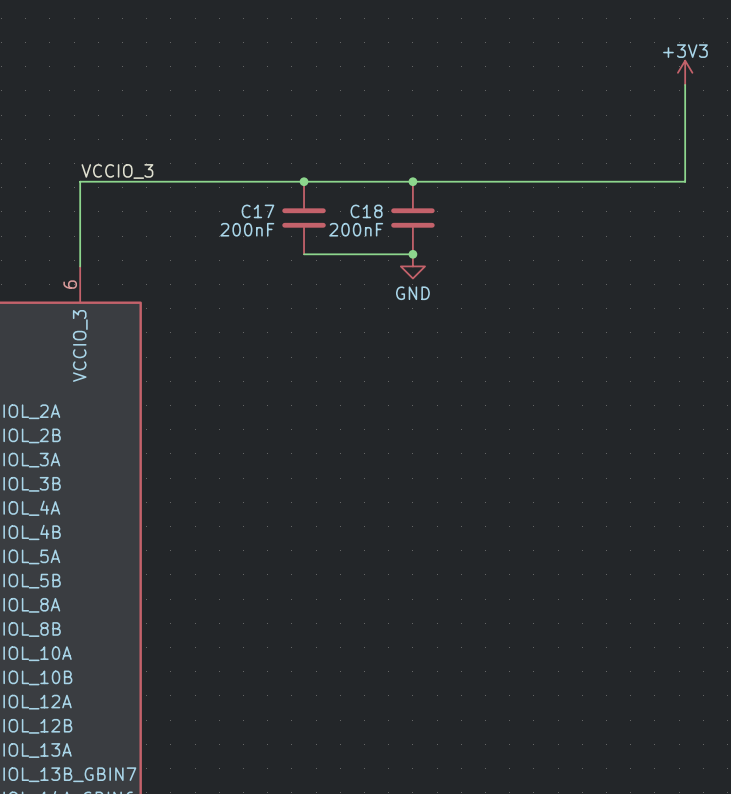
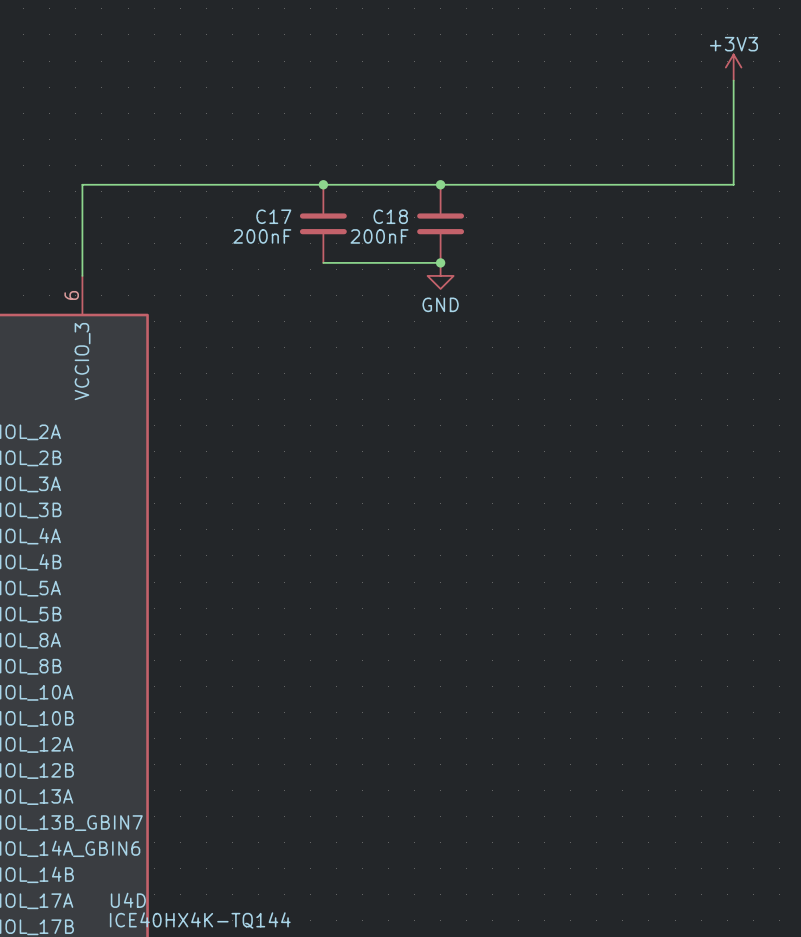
label: VCCIO_3 (117, 171) -> none

